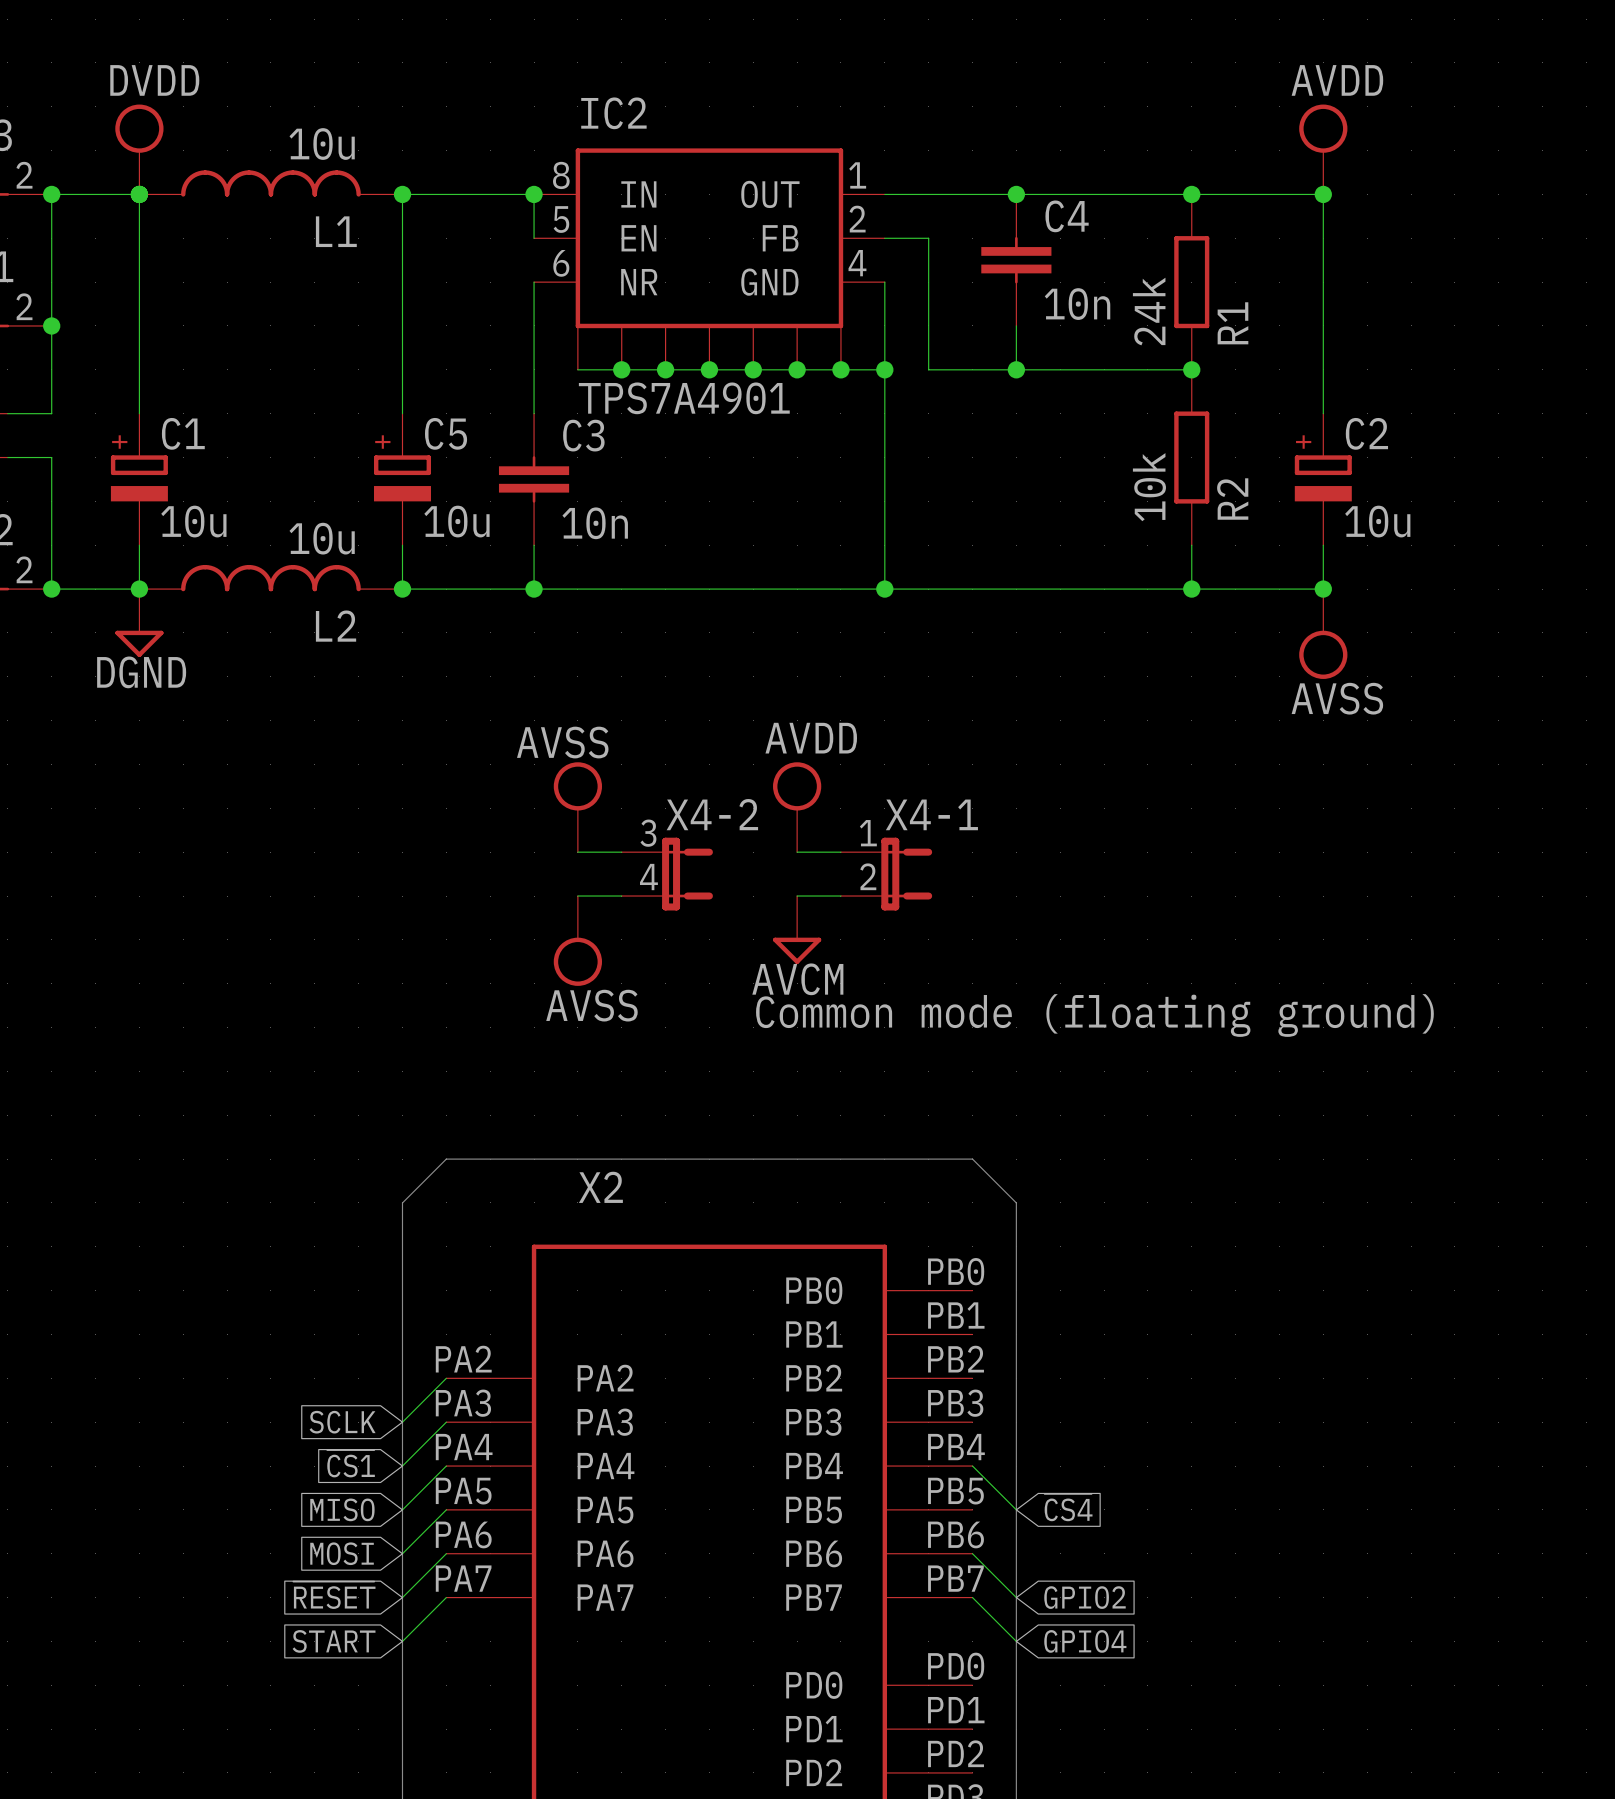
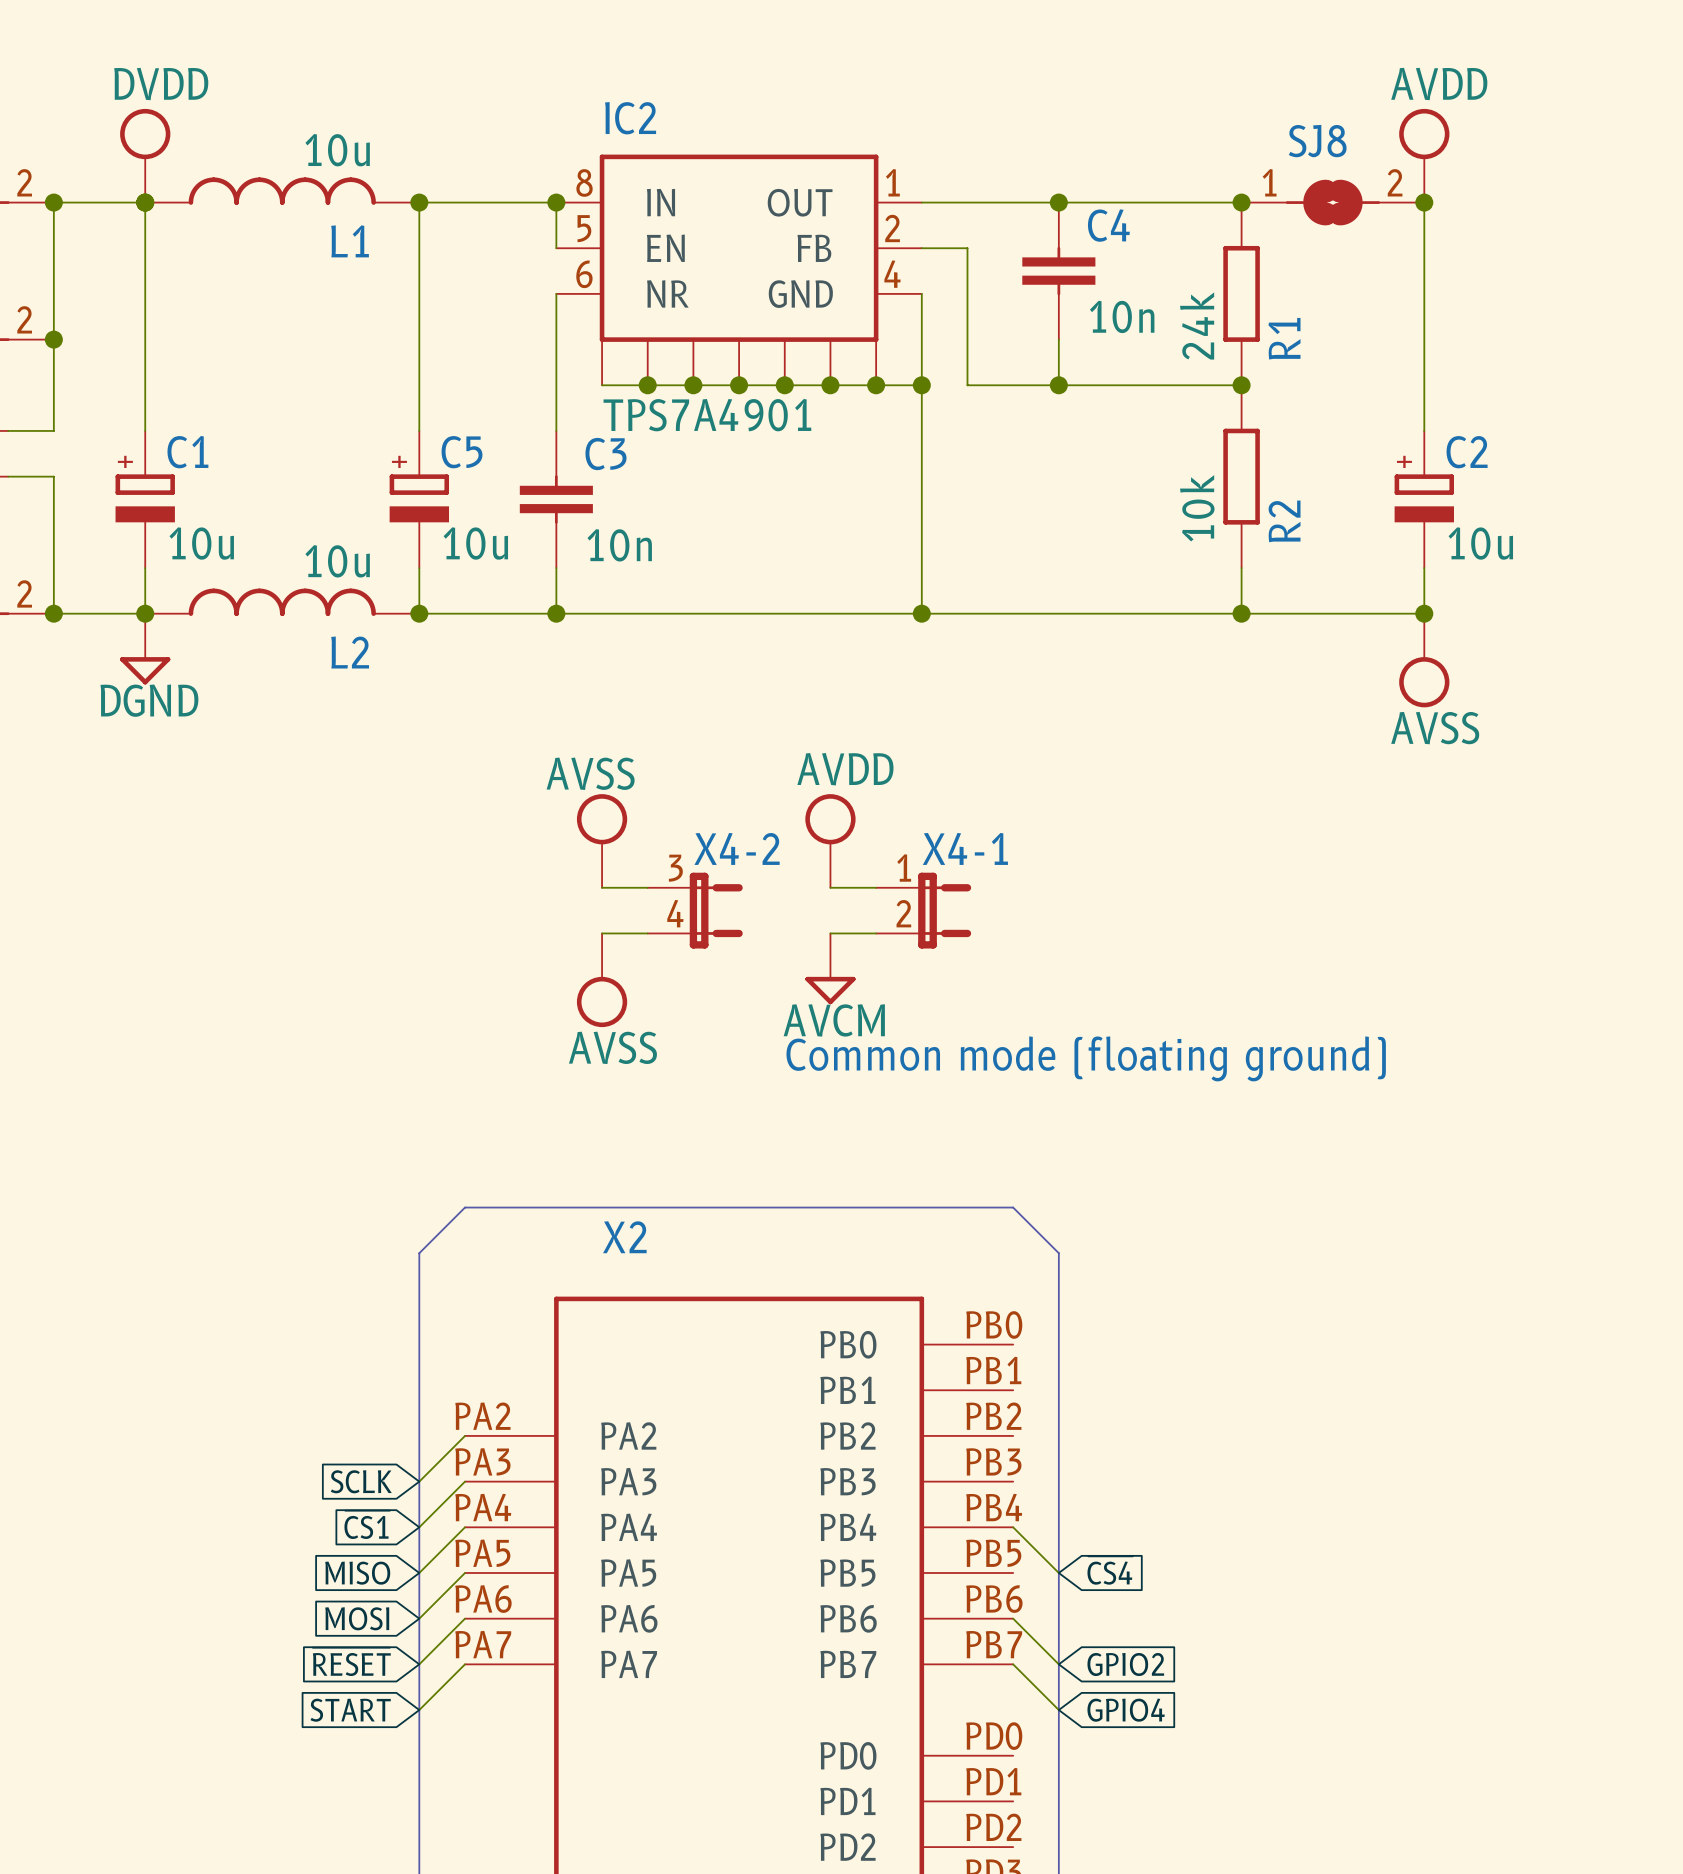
power symbol position: AVDD (1323, 149) -> AVDD (1424, 155)
wire: (1191, 194) (1323, 194) (1323, 413) -> none
SJ8: none -> (1332, 202)
junction position: (1323, 194) -> (1424, 202)
wire: none -> (1424, 202) (1424, 430)
C2 position: (1323, 479) -> (1424, 499)
wire: (1323, 545) (1323, 589) -> (1424, 568) (1424, 613) (1378, 613)
junction position: (1323, 589) -> (1424, 613)
power symbol position: AVSS (1323, 634) -> AVSS (1424, 660)

